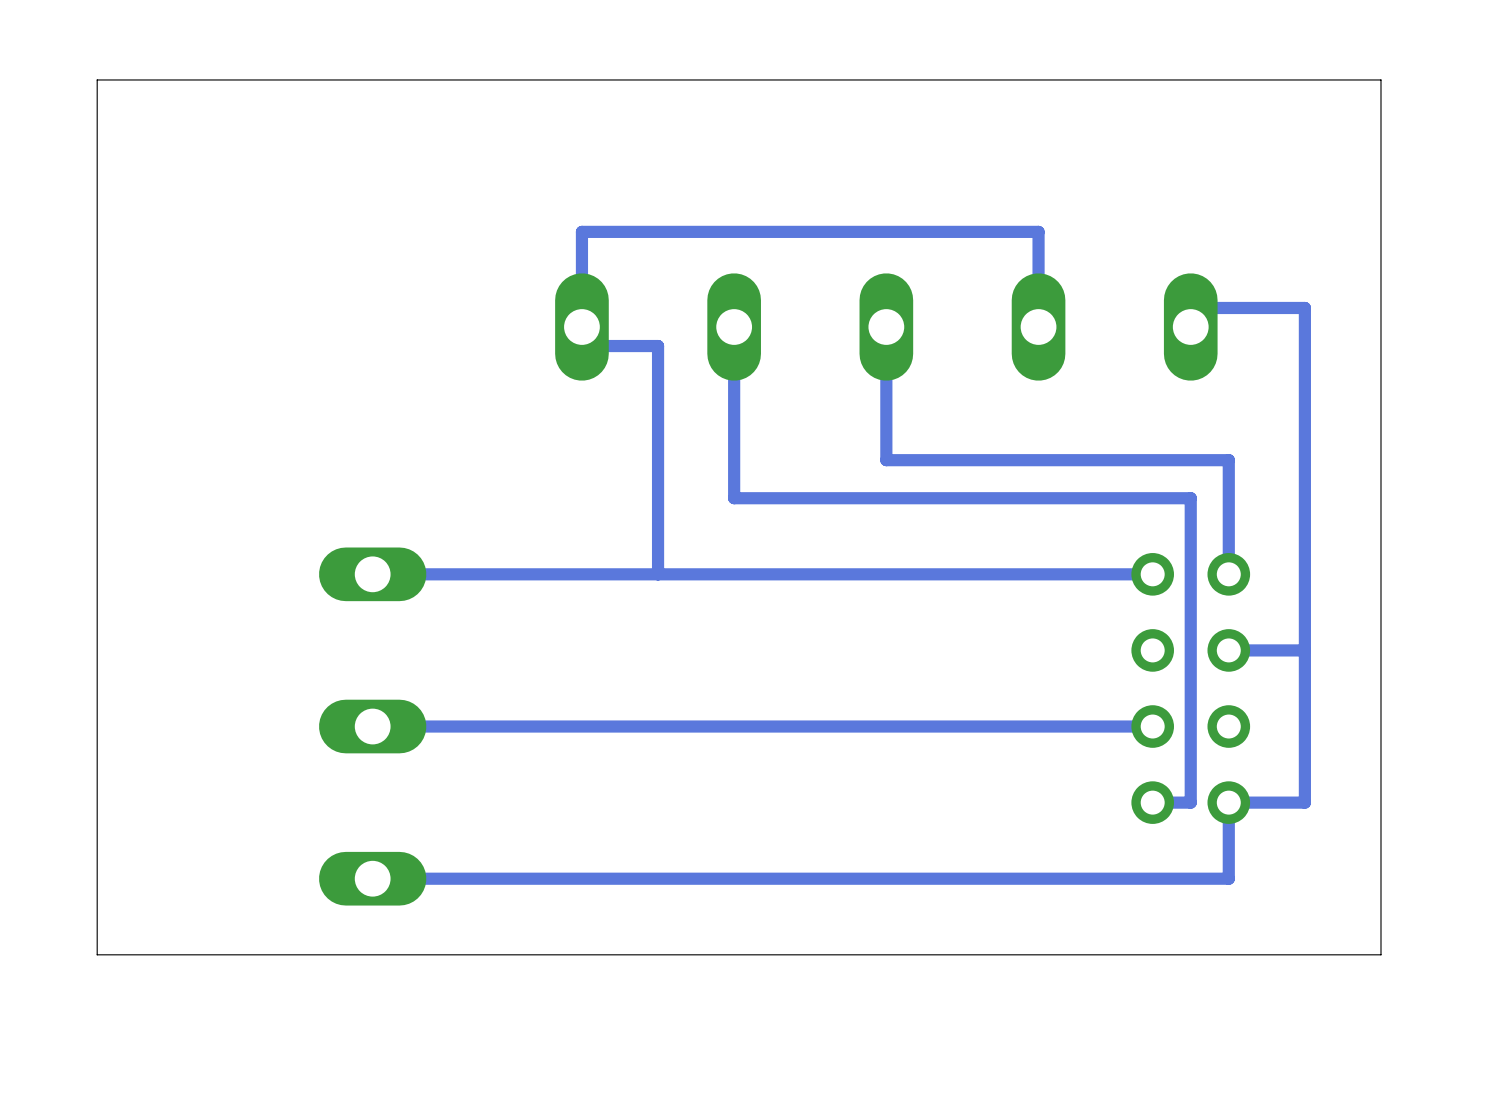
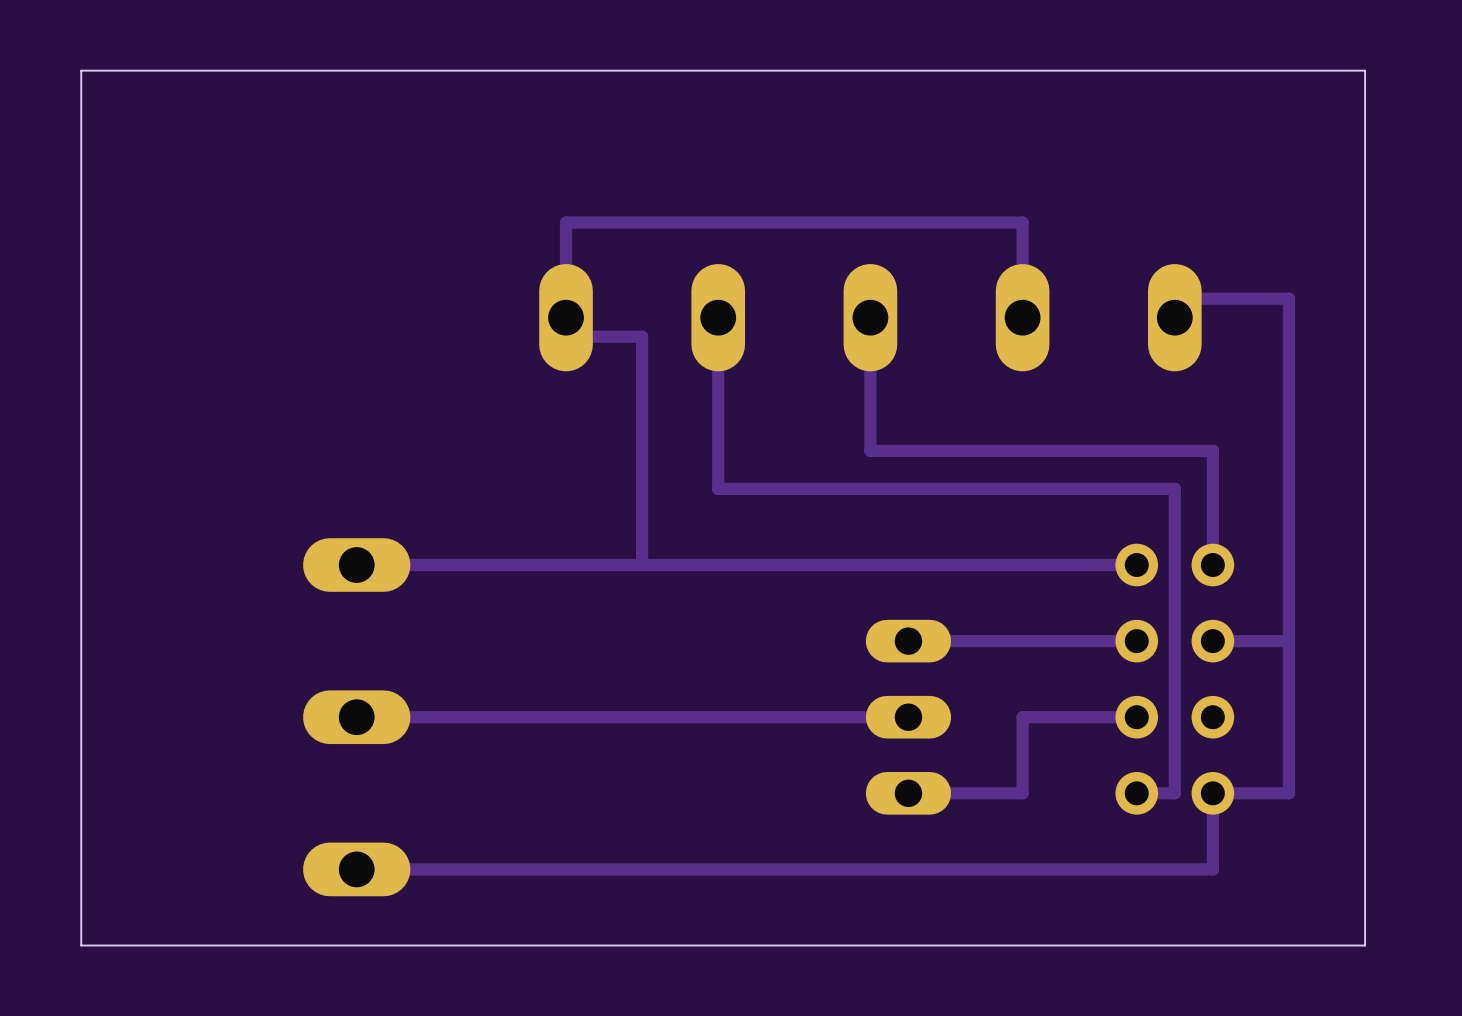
track: none -> (1136, 641) (908, 641)
part: none -> (908, 717)
track: (1038, 726) (924, 726) -> (1022, 717) (1022, 793) (908, 793)

